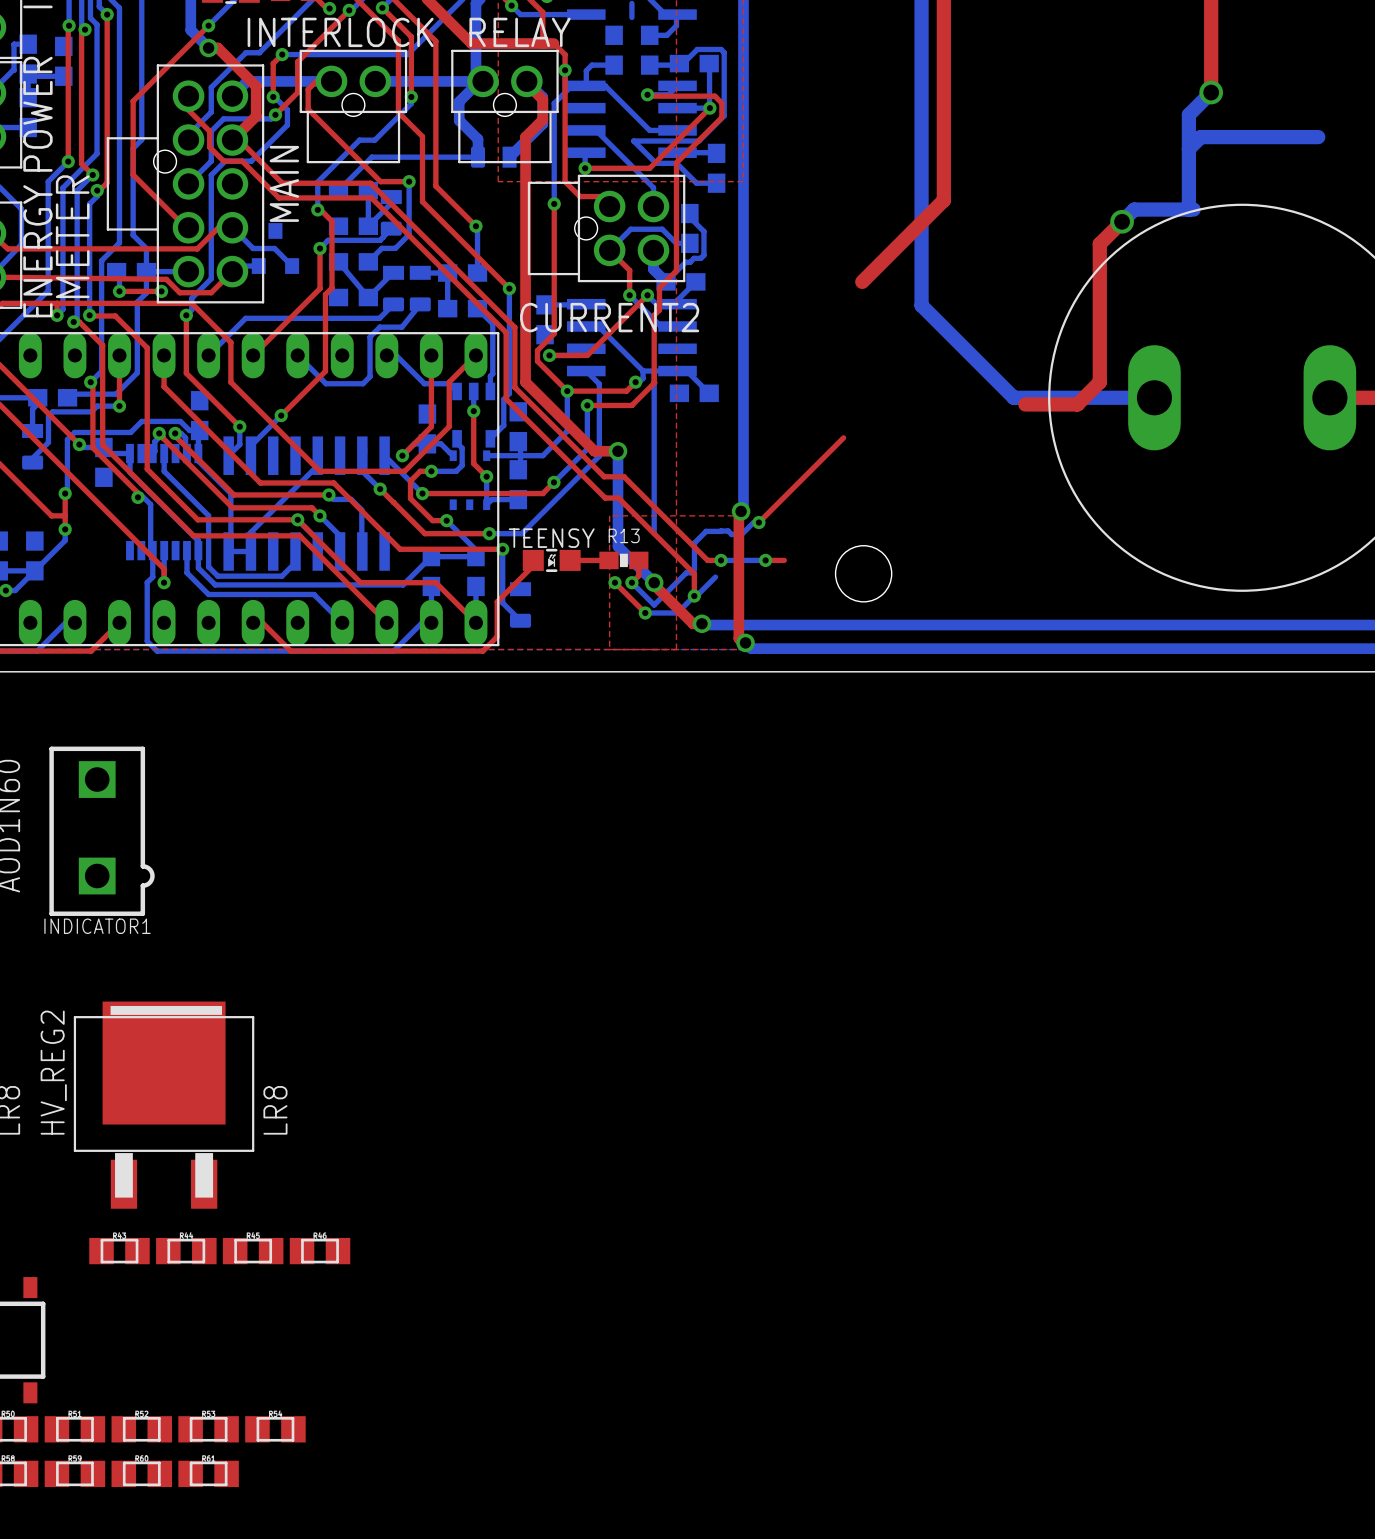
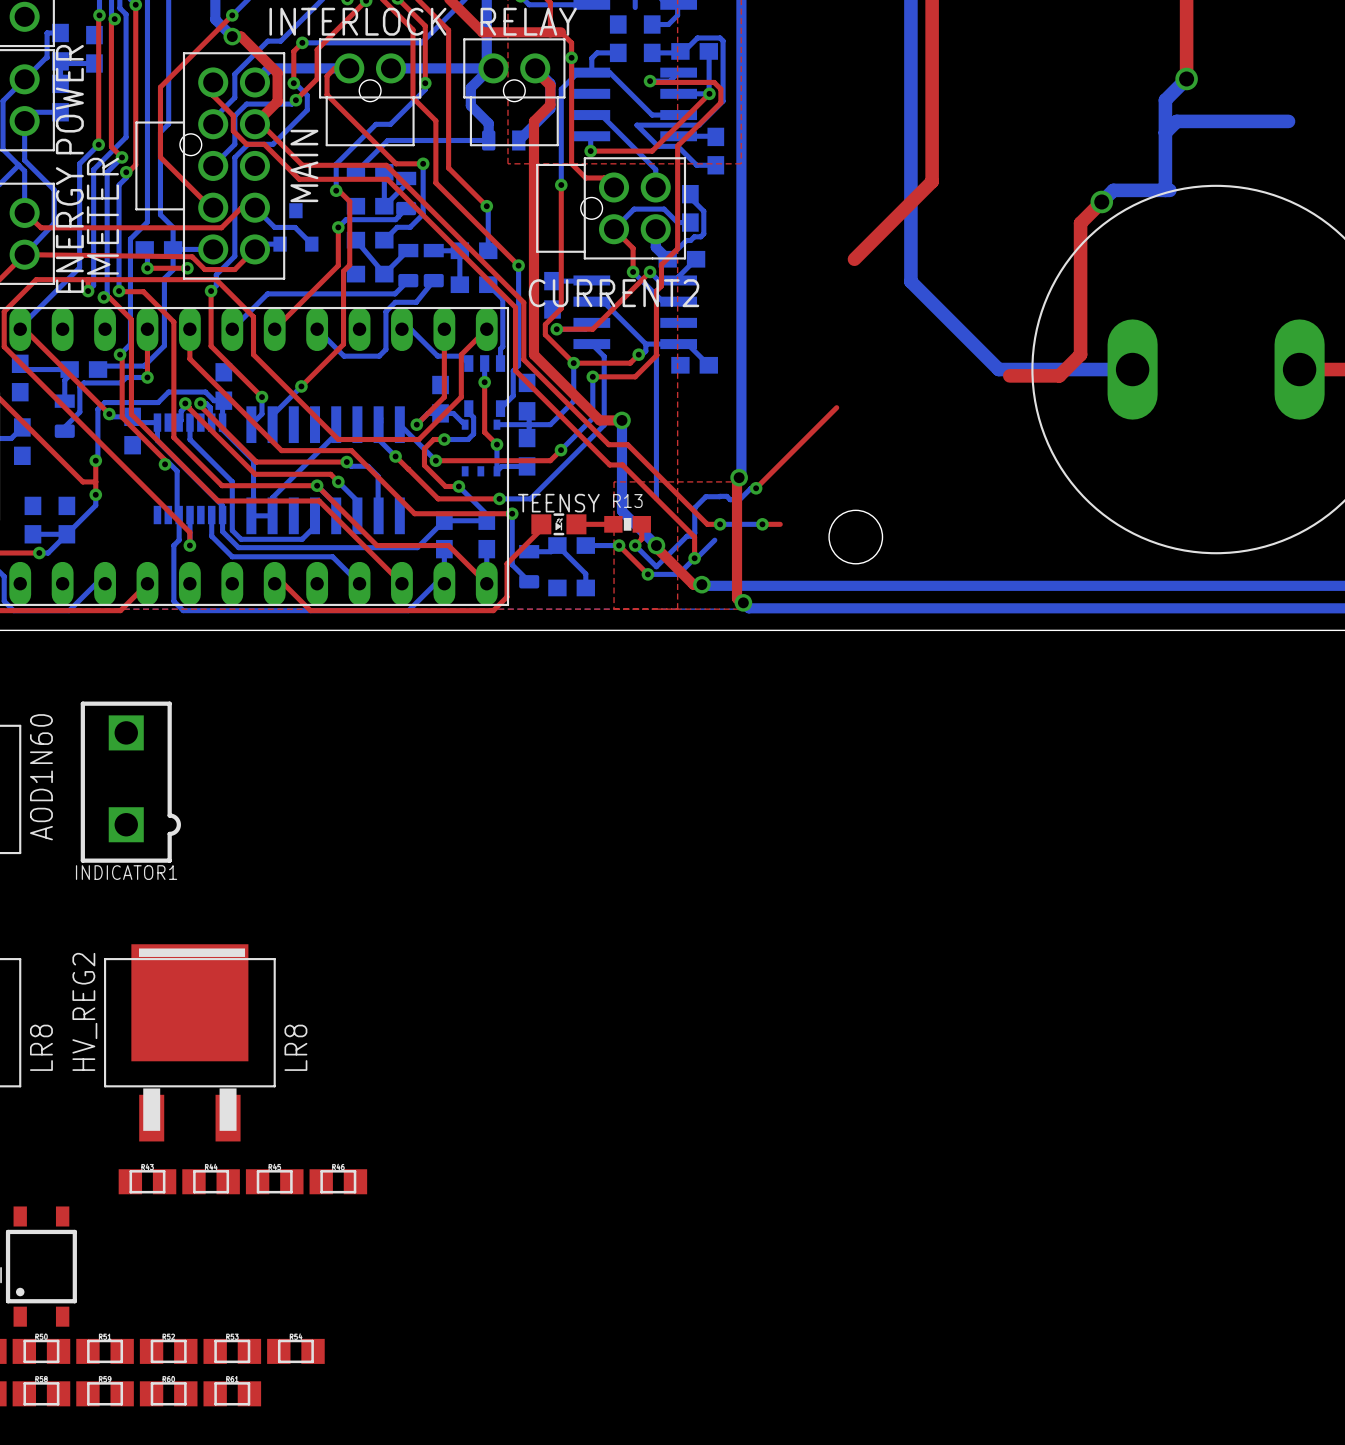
part: none -> (571, 545)
bottom track: none -> (585, 545) (619, 545)
bottom track: none -> (529, 551) (551, 551) (557, 545) (585, 573) (585, 587)
part: none -> (571, 587)

